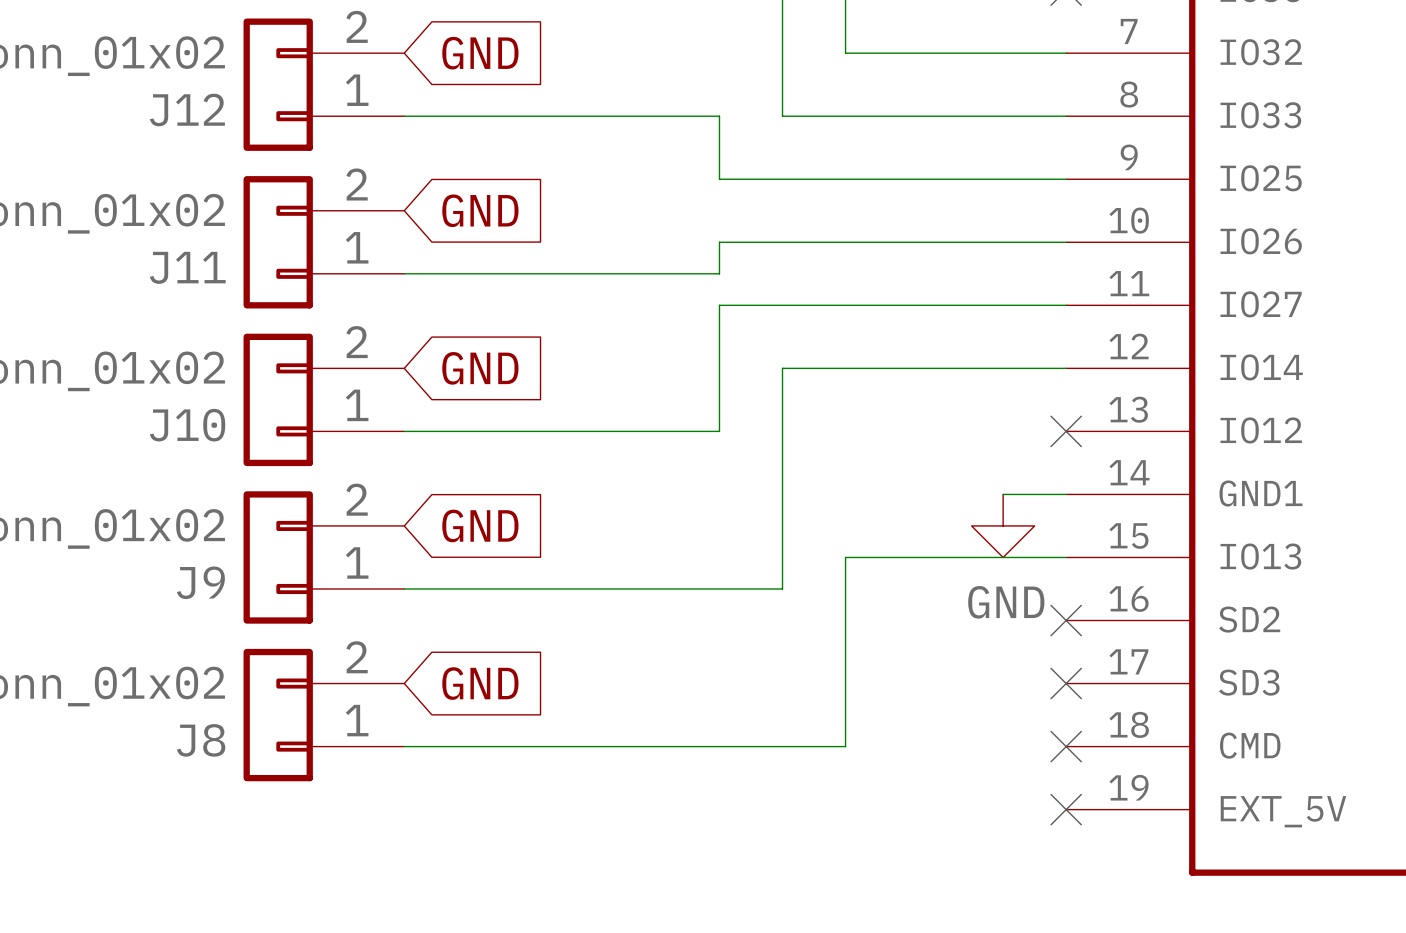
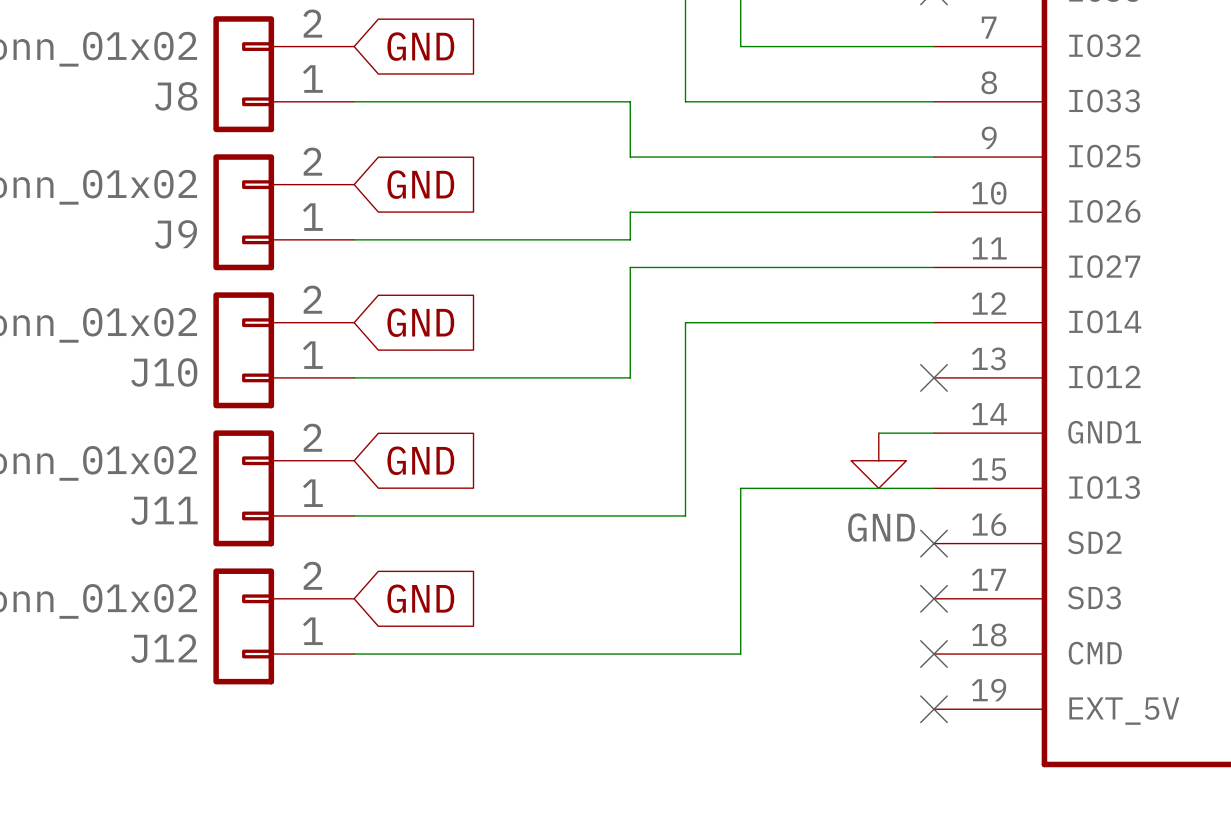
J12 name: J12 (187, 109) -> J8 (176, 96)
J11 name: J11 (187, 267) -> J9 (176, 234)
J9 name: J9 (200, 582) -> J11 (164, 510)
J8 name: J8 (201, 740) -> J12 (164, 648)

